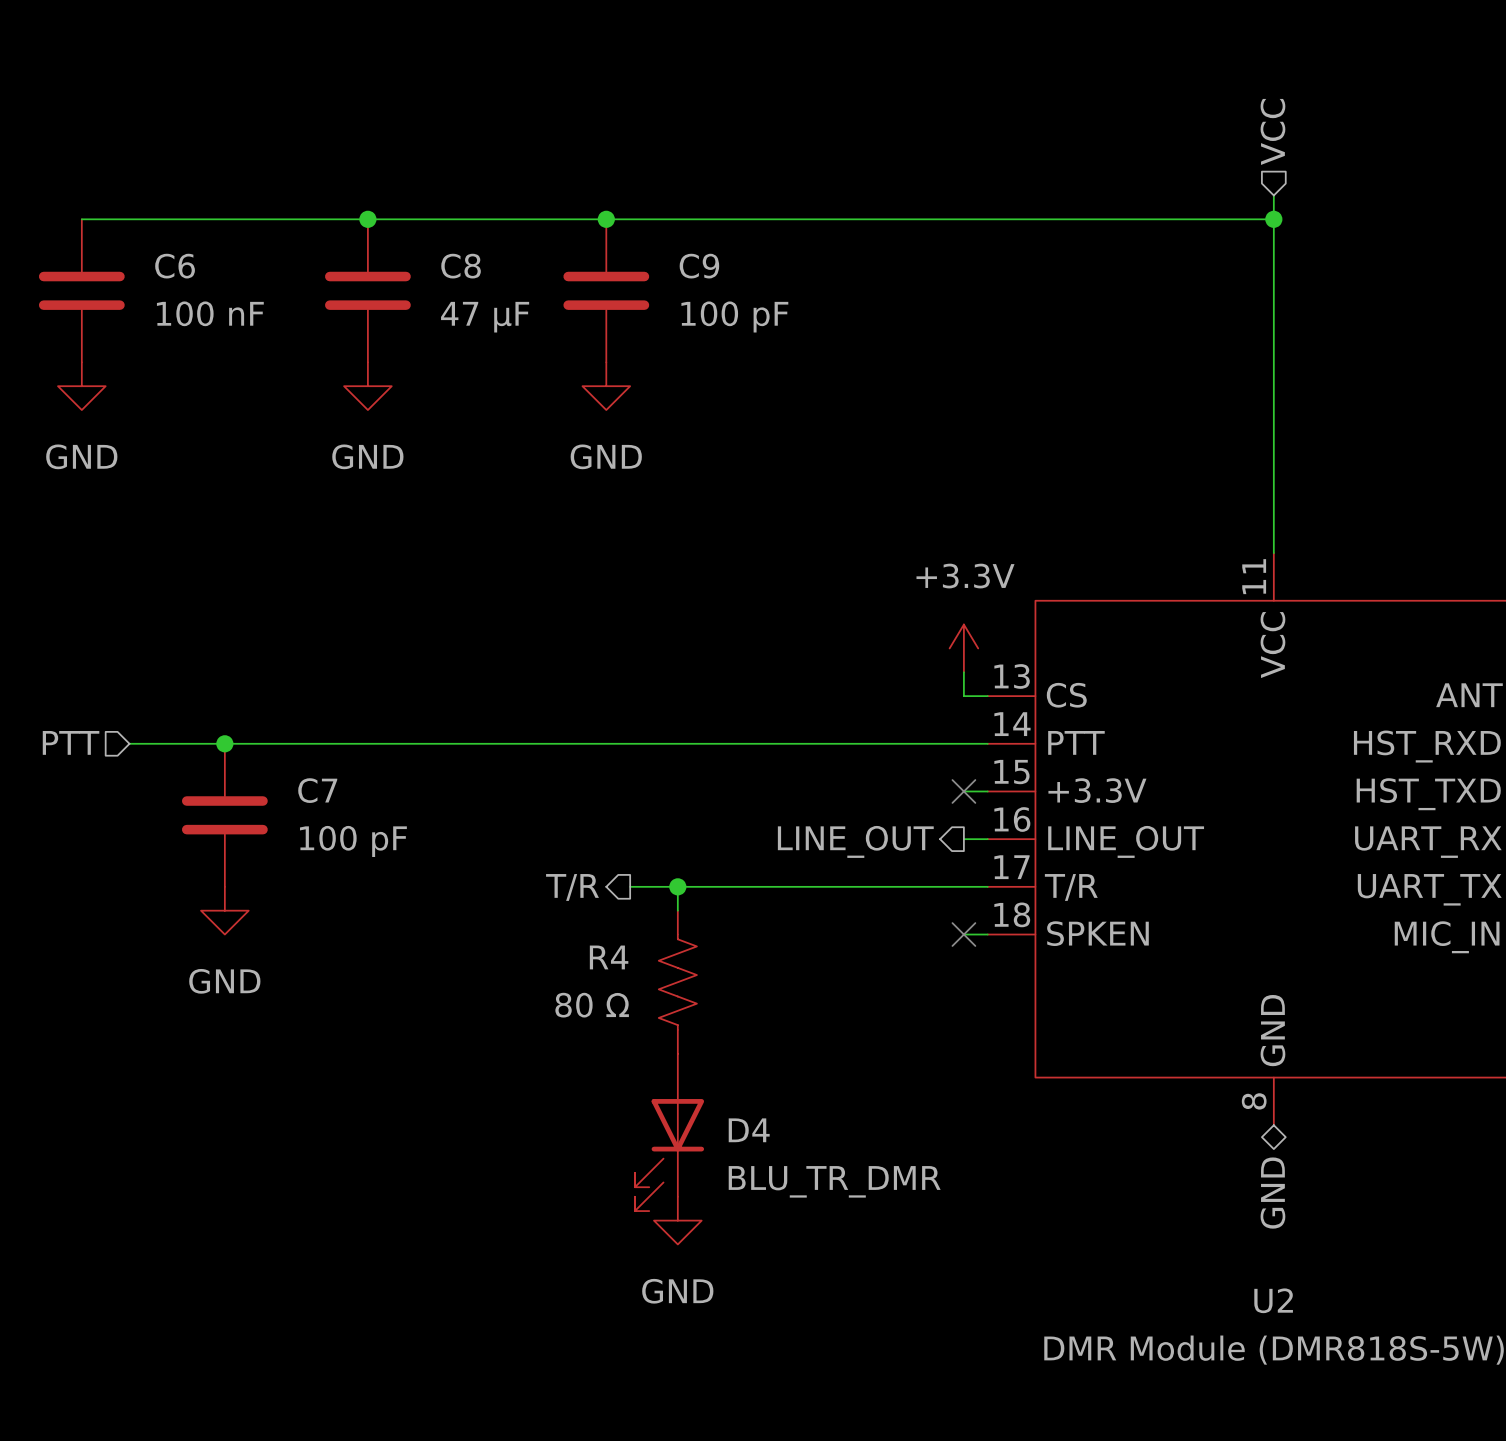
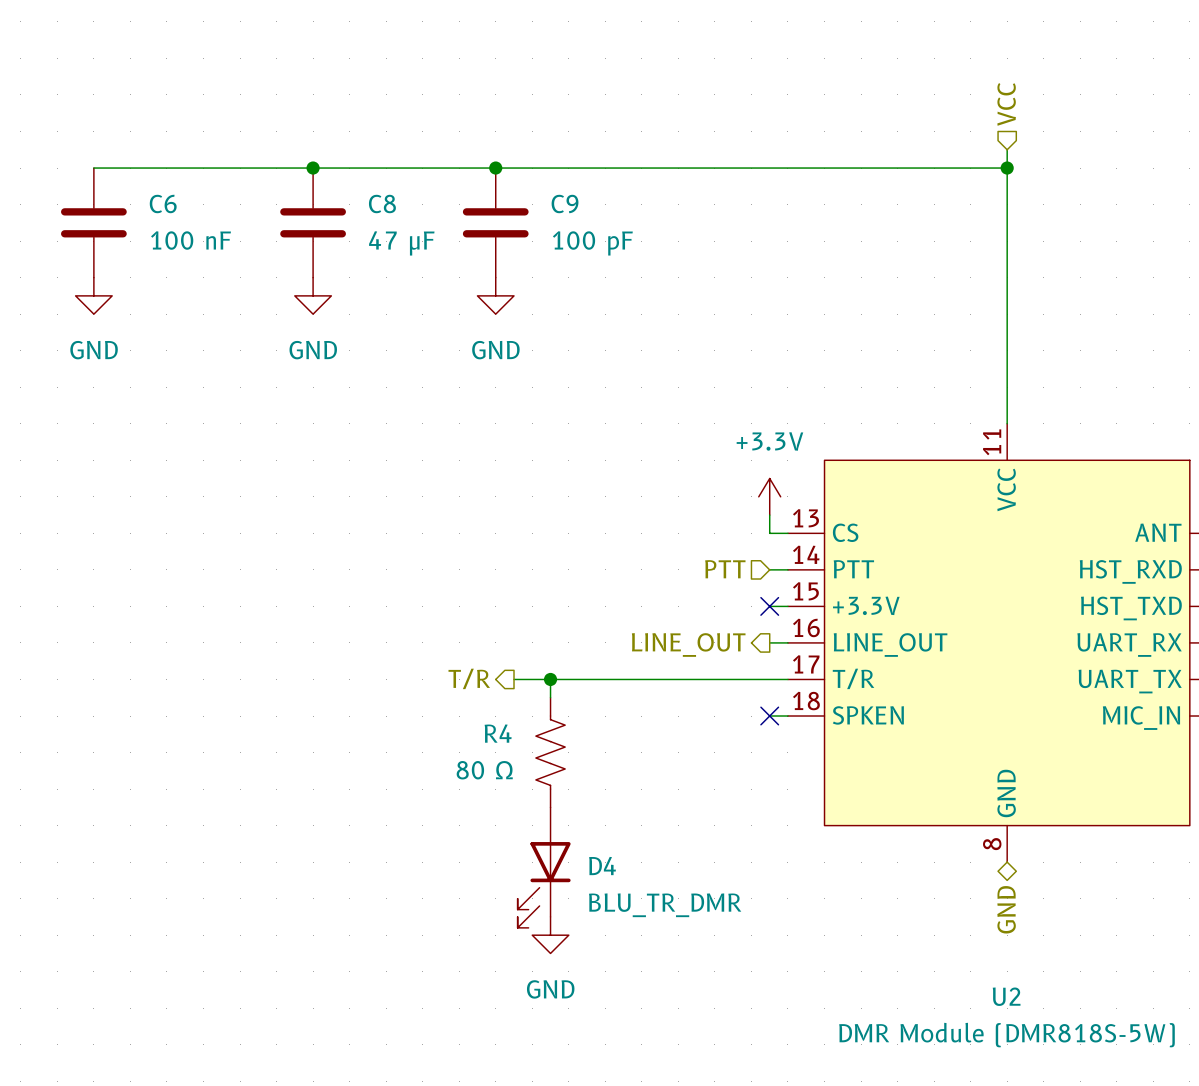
hierarchical label: PTT (71, 742) -> none
hierarchical label: none -> PTT (725, 569)
wire: (129, 743) (963, 743) -> none
junction: (224, 743) -> none
C7: 100 pF (224, 815) -> none
power symbol: GND (224, 910) -> none

